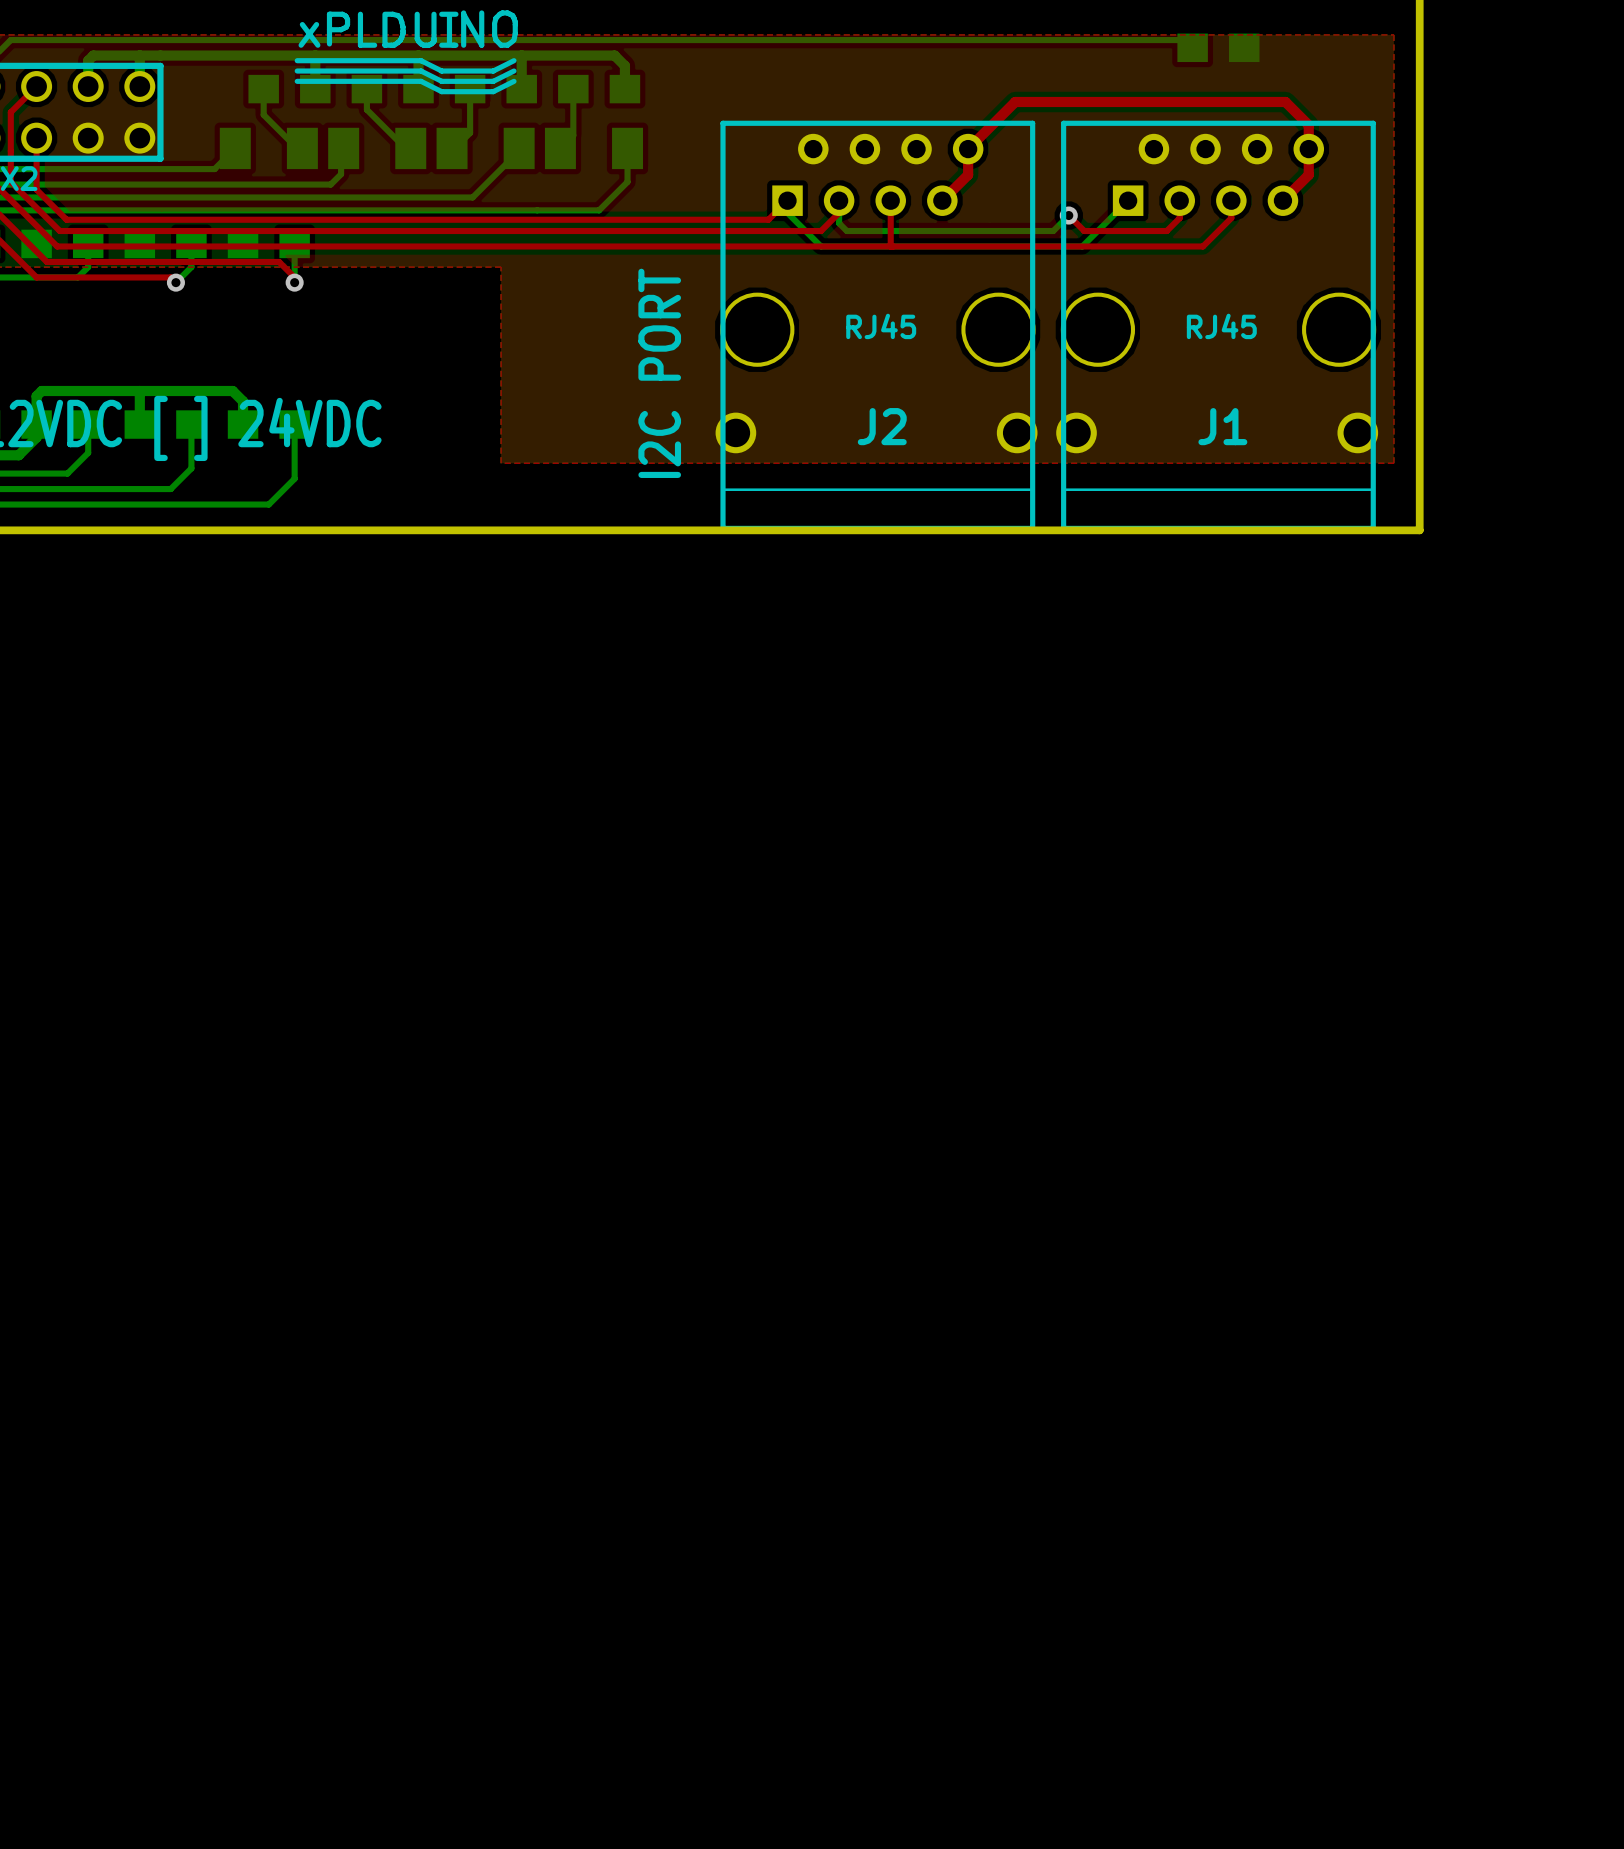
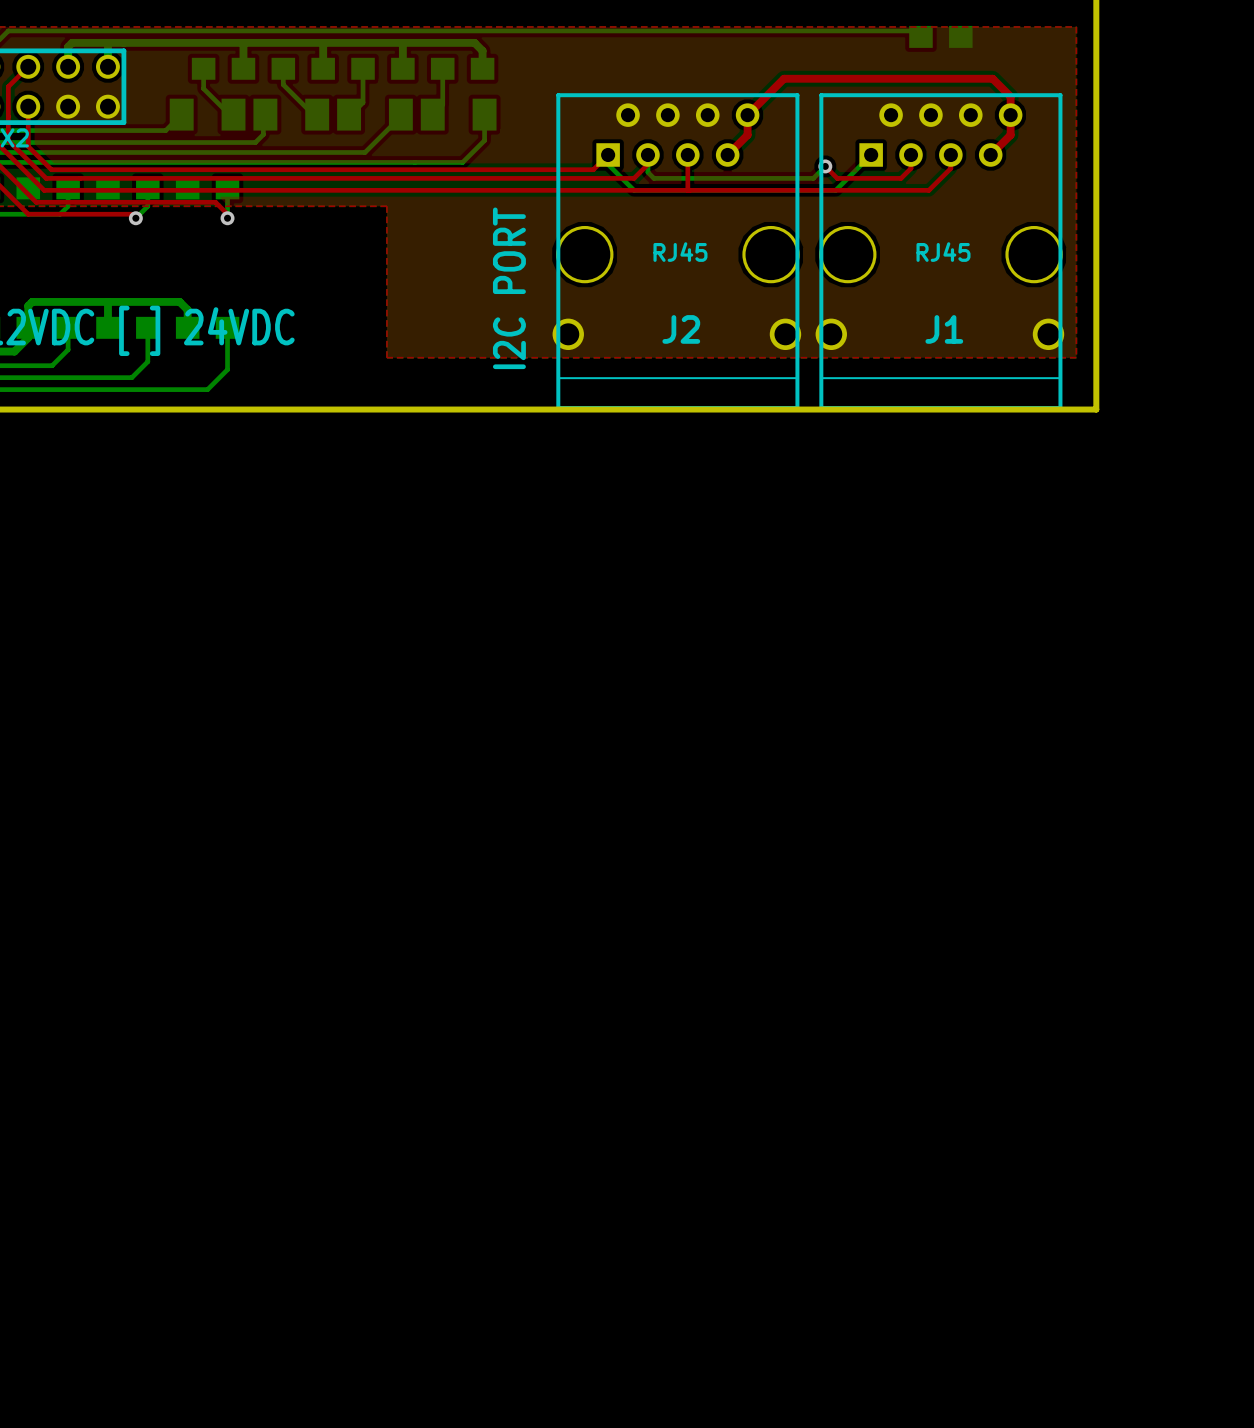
drawing: [294, 10, 518, 95] -> none

